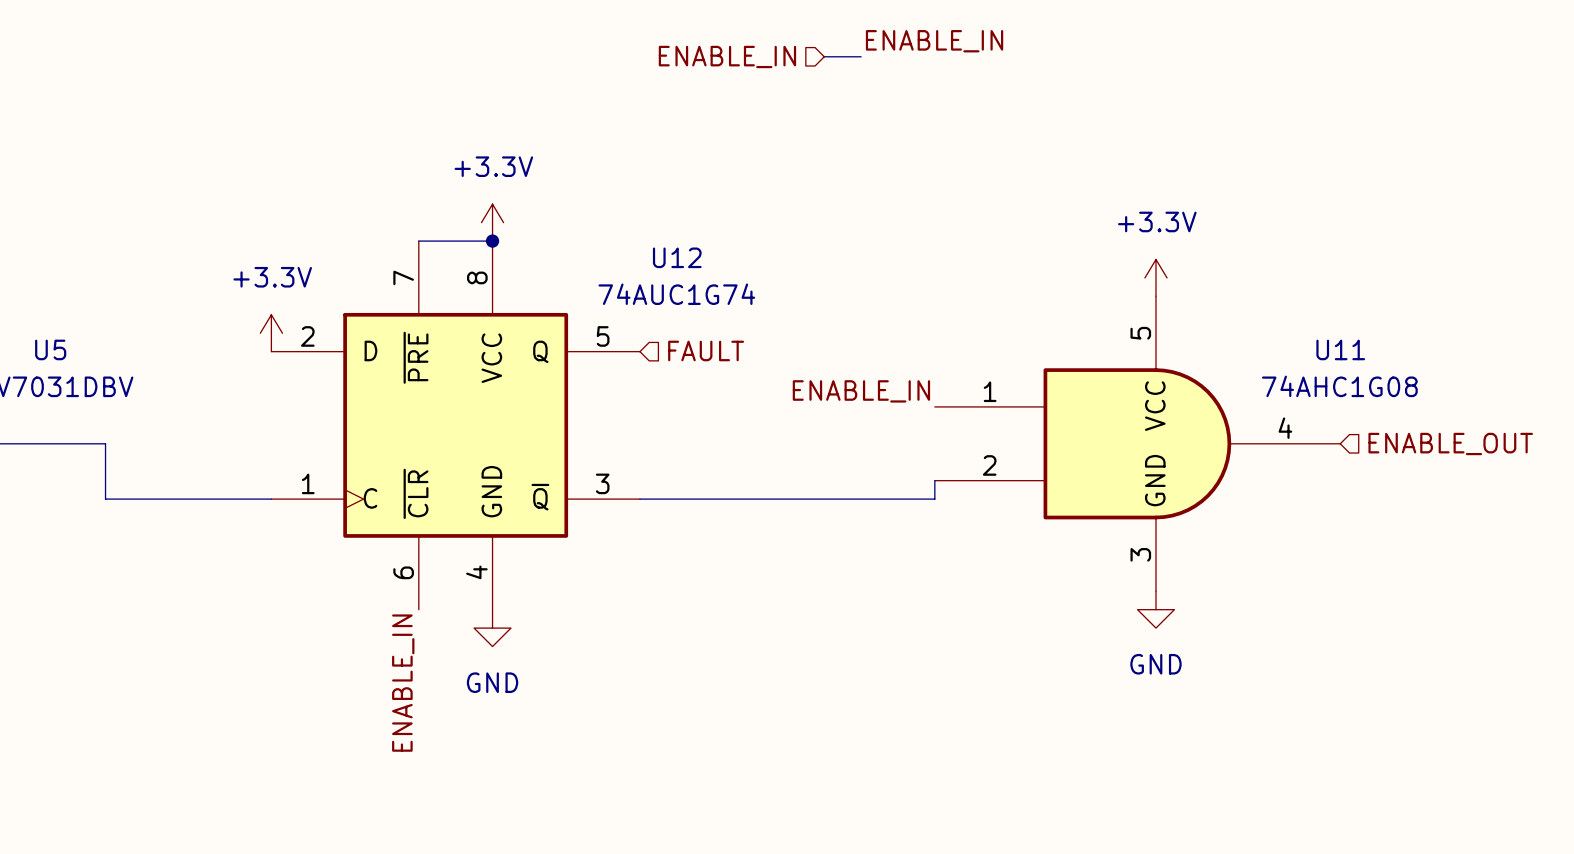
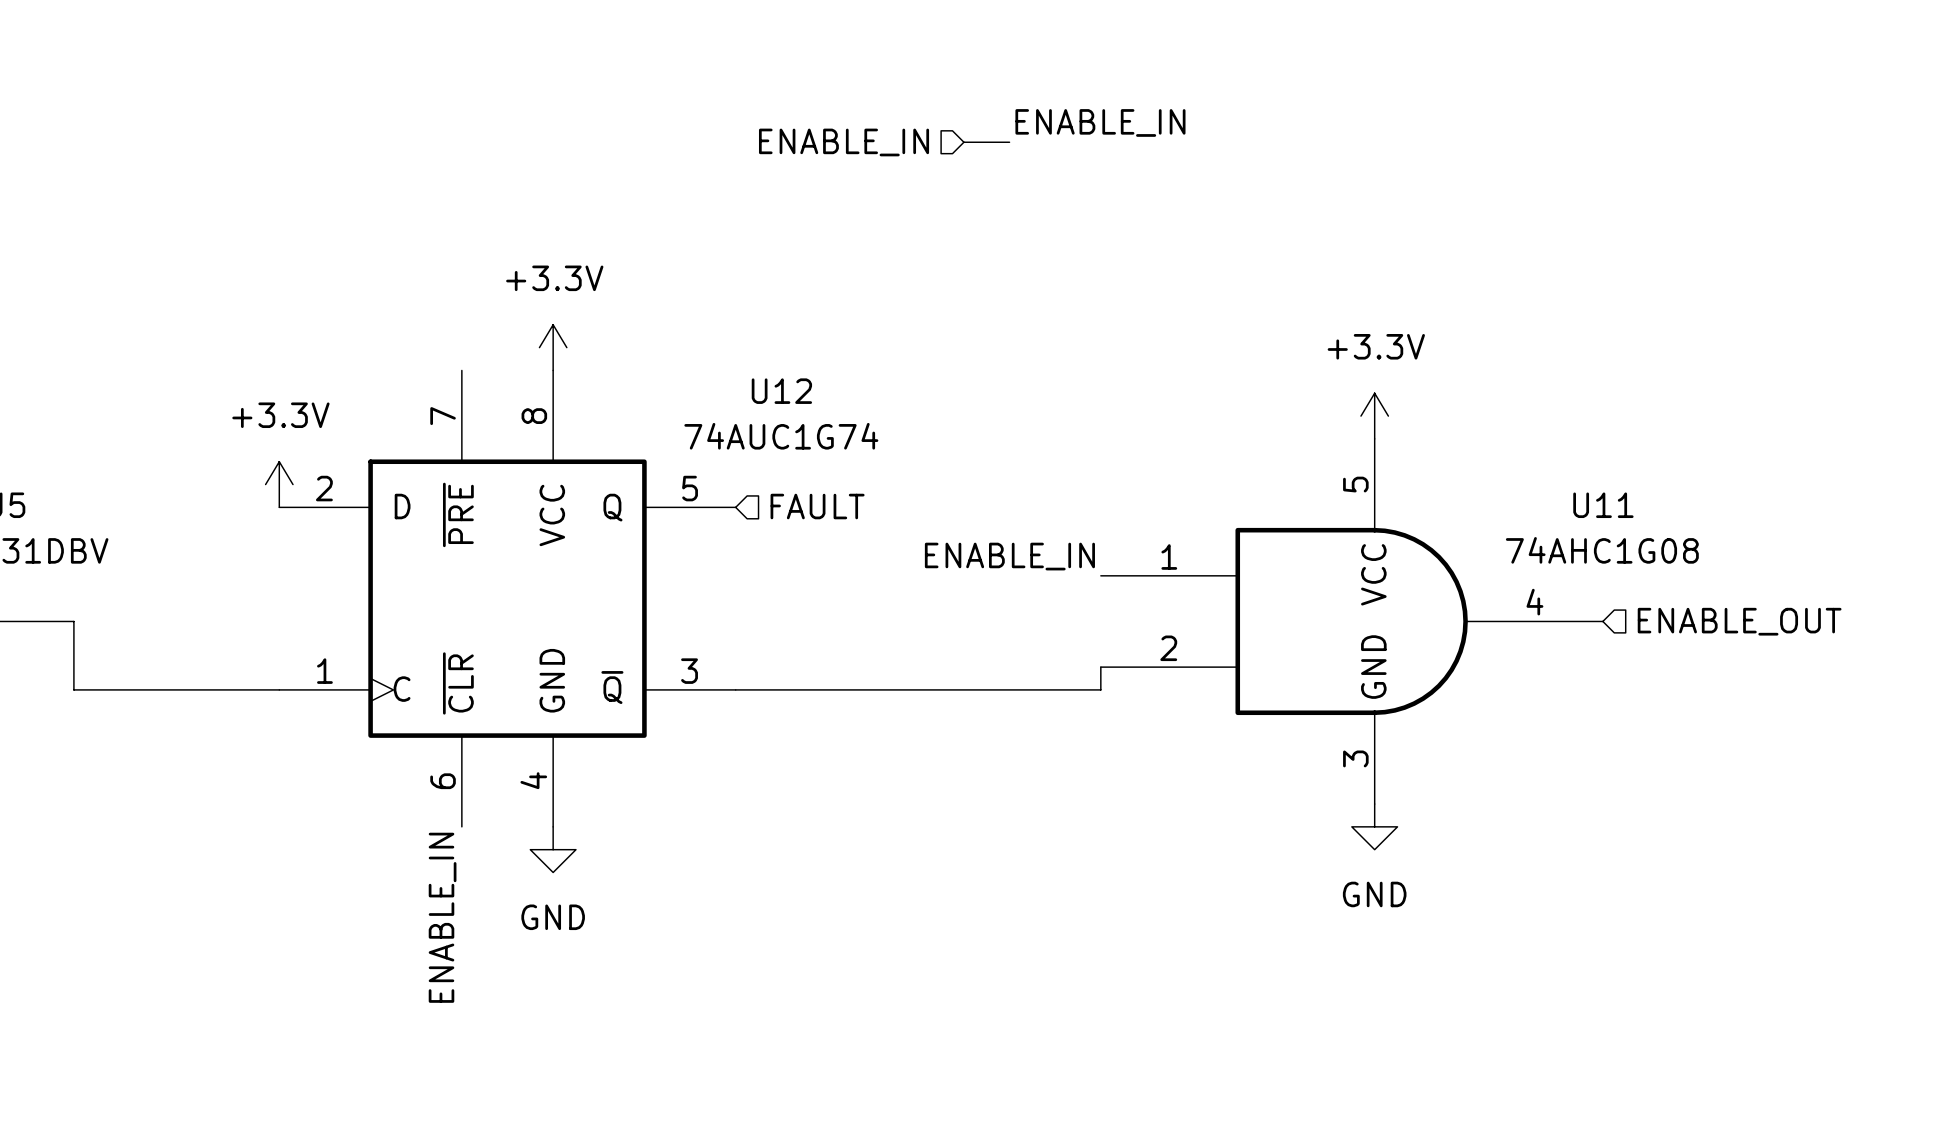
wire: (418, 241) (492, 241) -> none
junction: (492, 241) -> none

